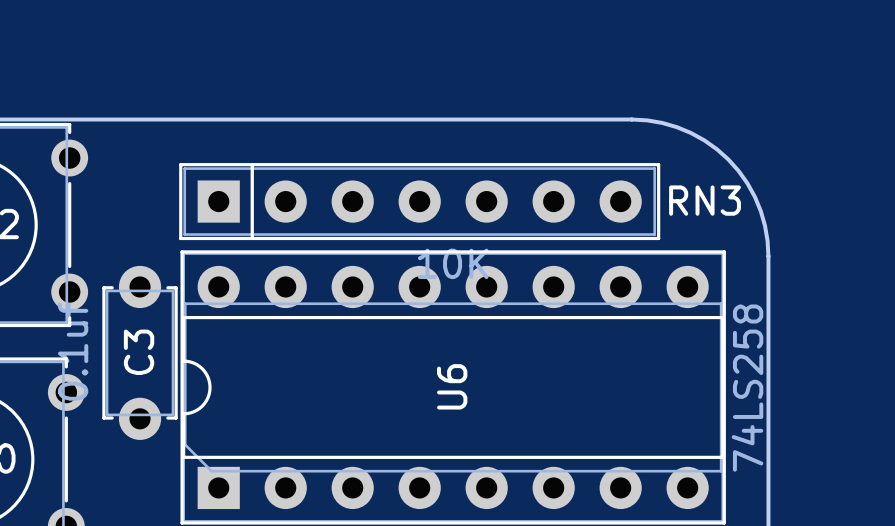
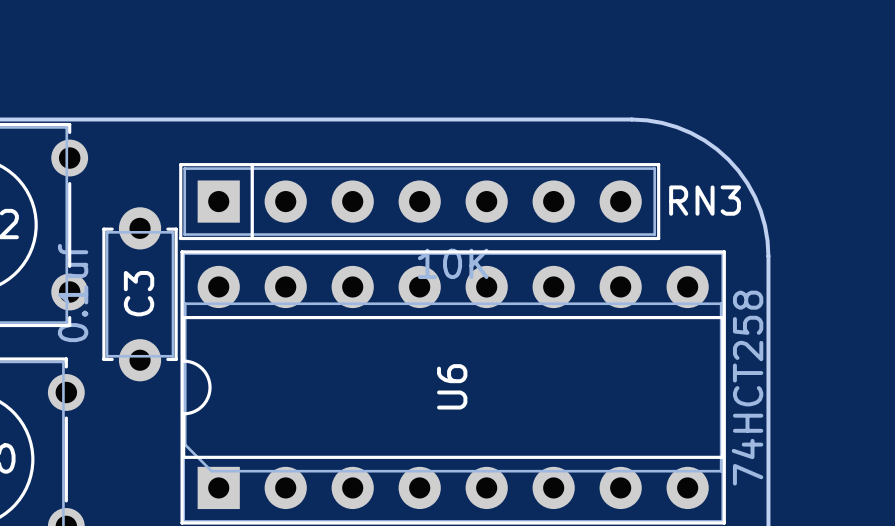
C3 position: (140, 352) -> (140, 294)
U6 value: 74LS258 (747, 388) -> 74HCT258 (747, 388)

